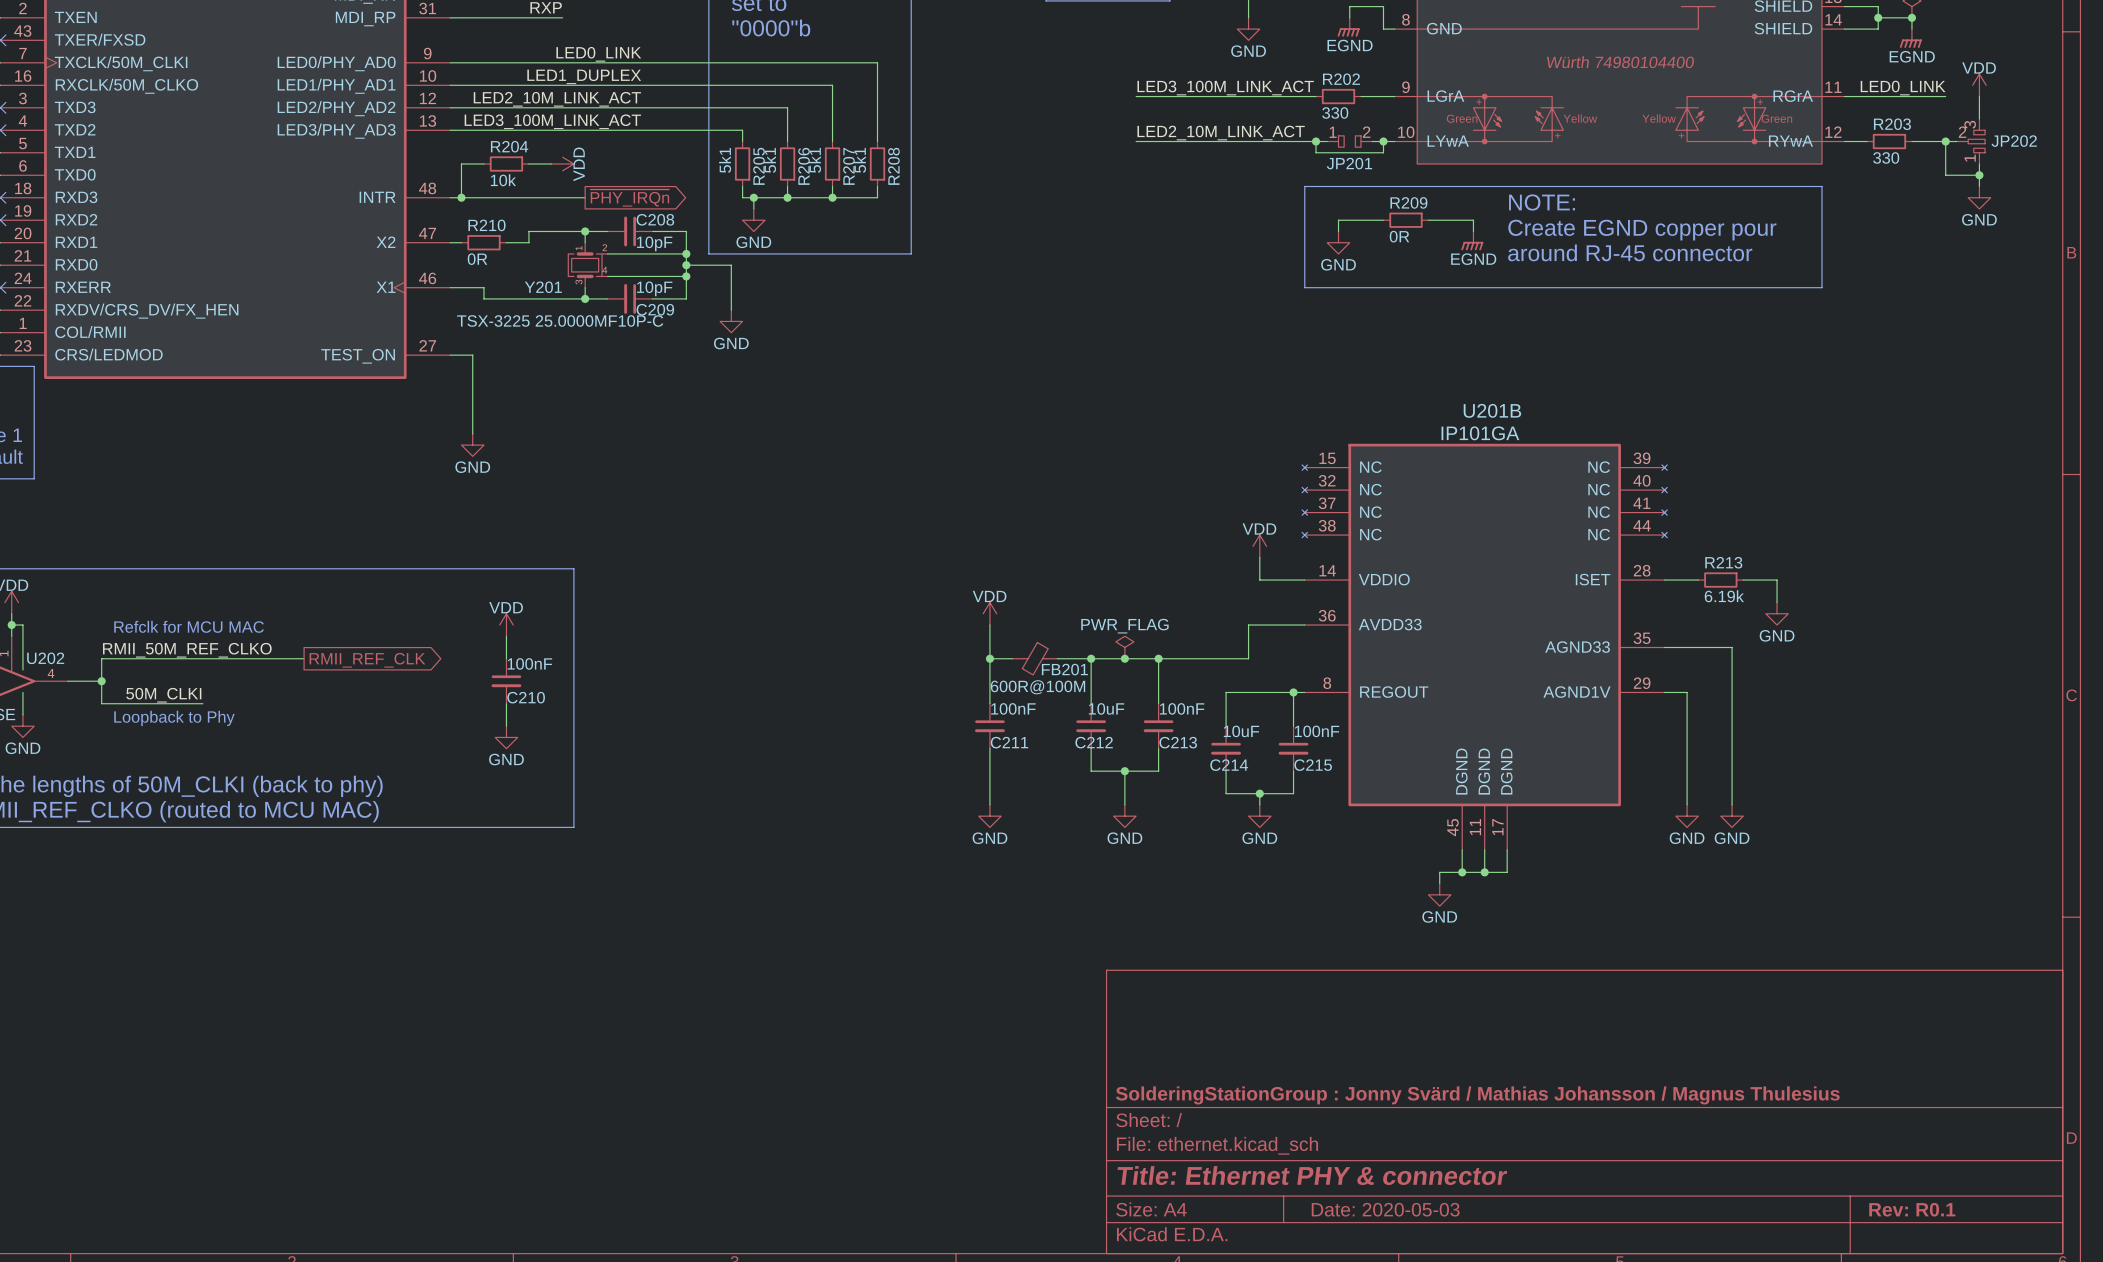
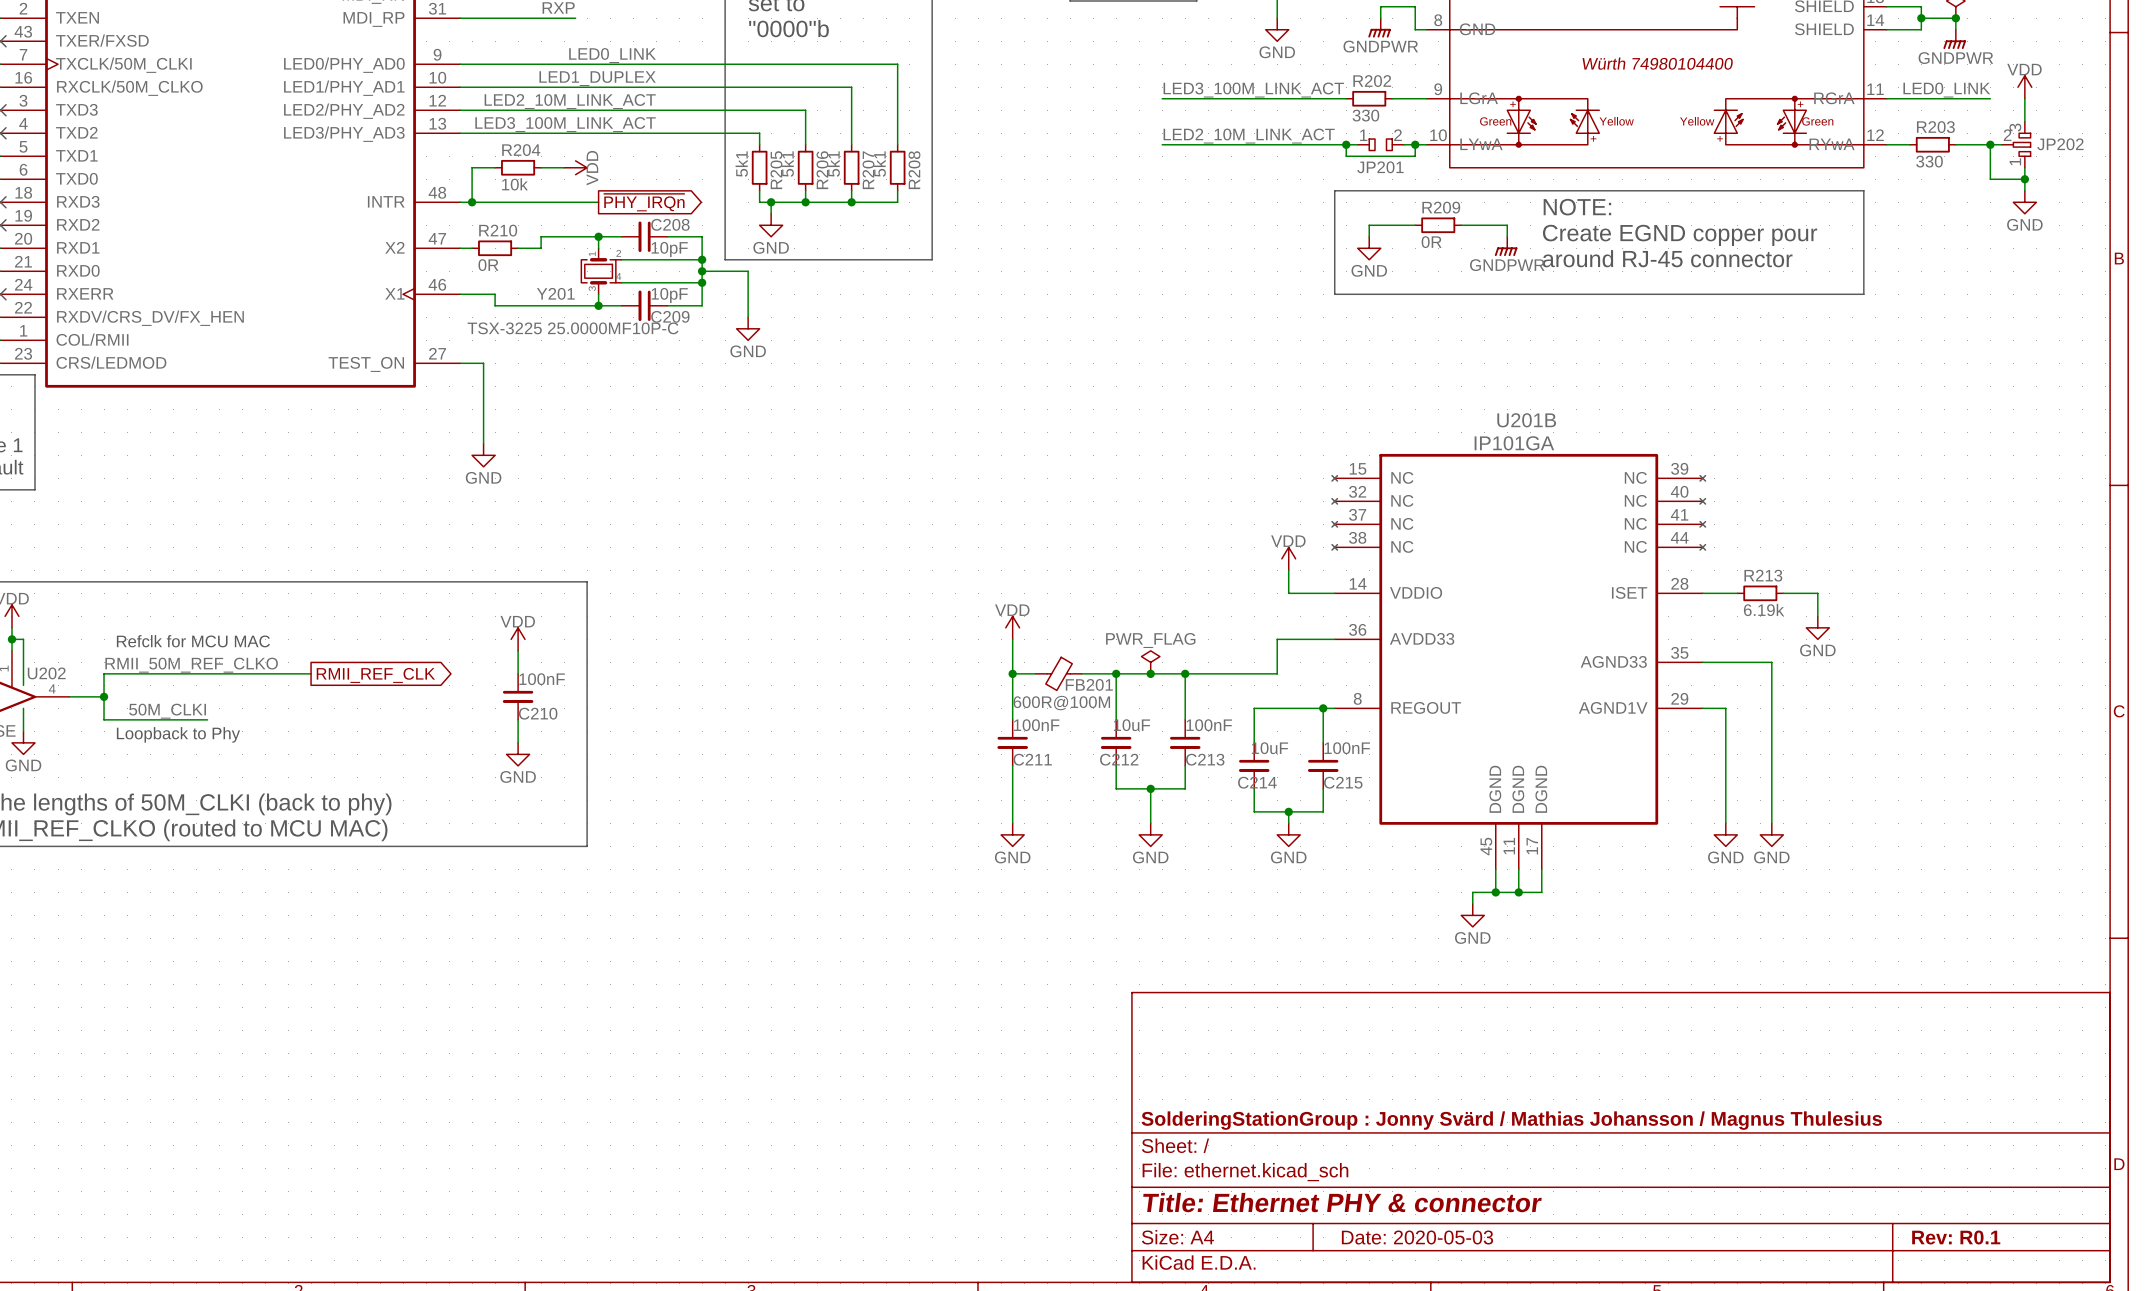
power symbol: EGND (1348, 27) -> GNDPWR (1379, 27)
power symbol: EGND (1910, 38) -> GNDPWR (1954, 39)
power symbol: EGND (1472, 240) -> GNDPWR (1506, 246)

